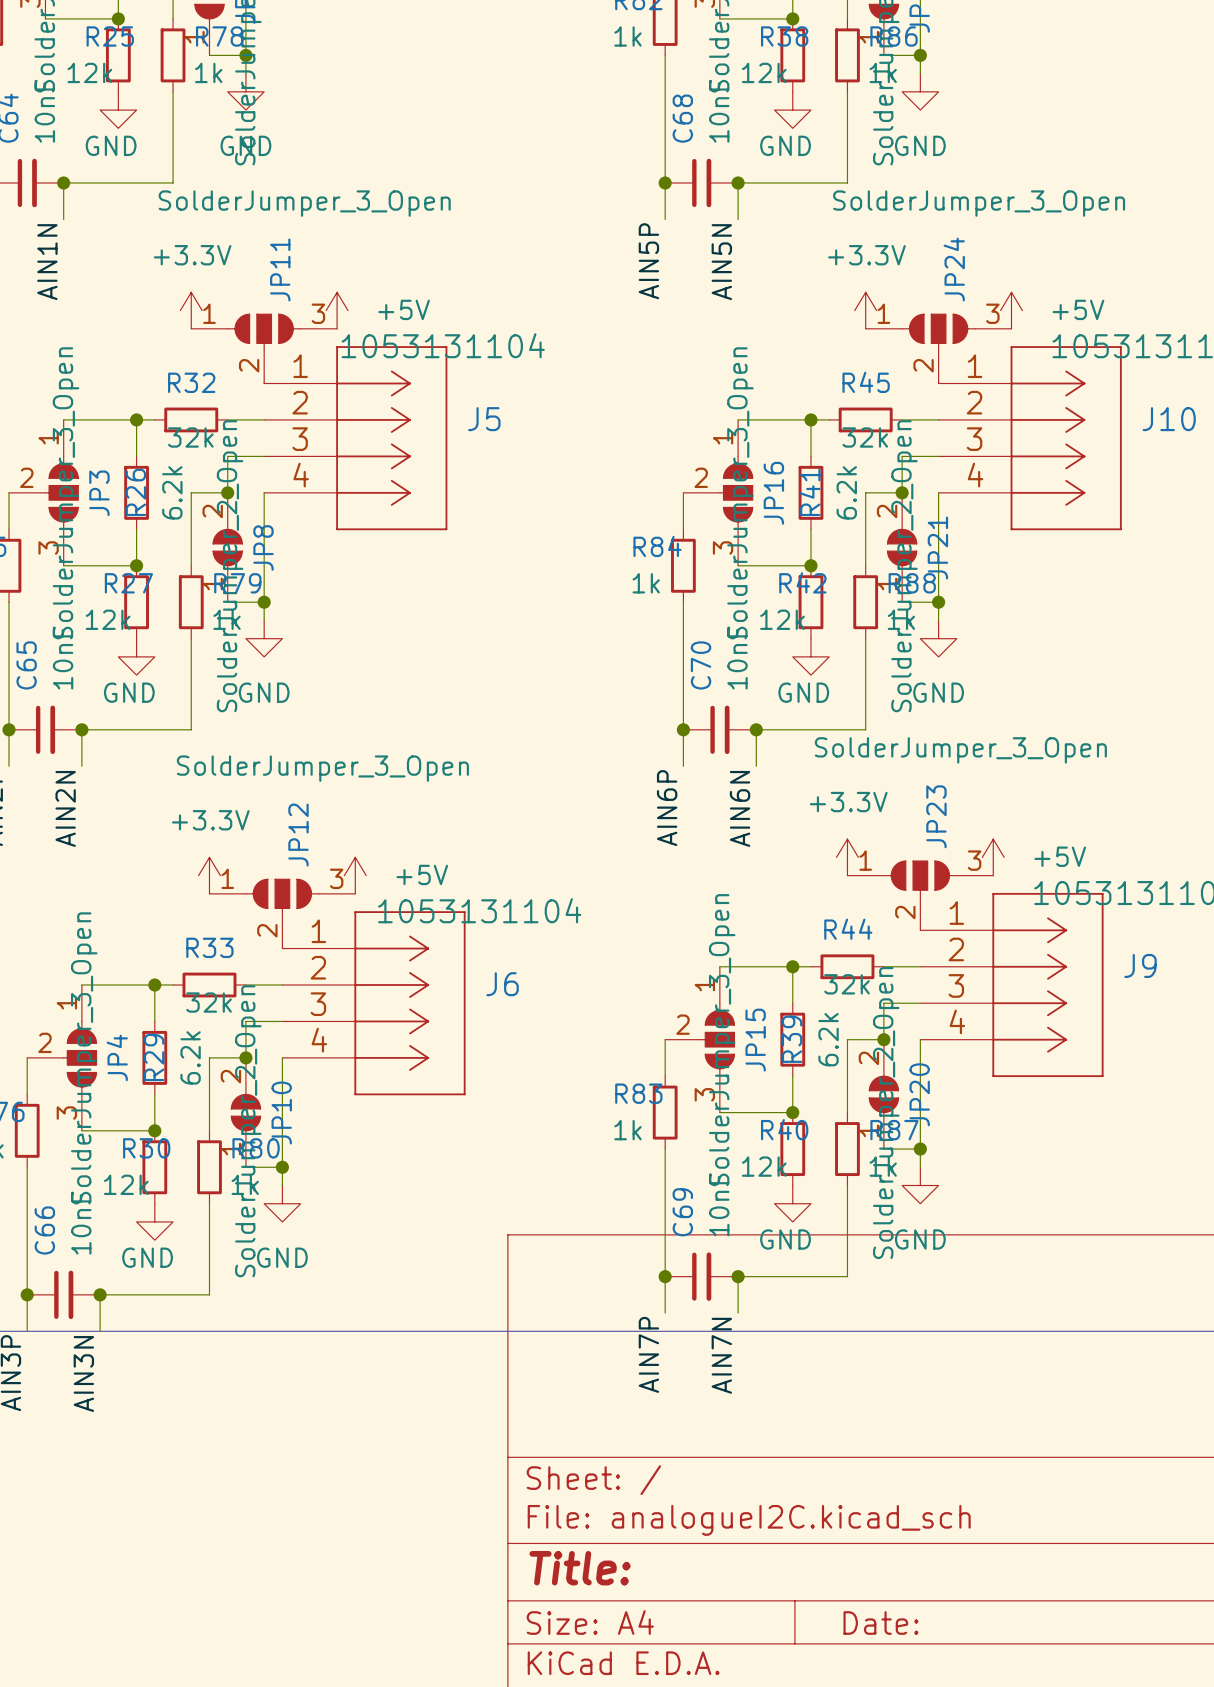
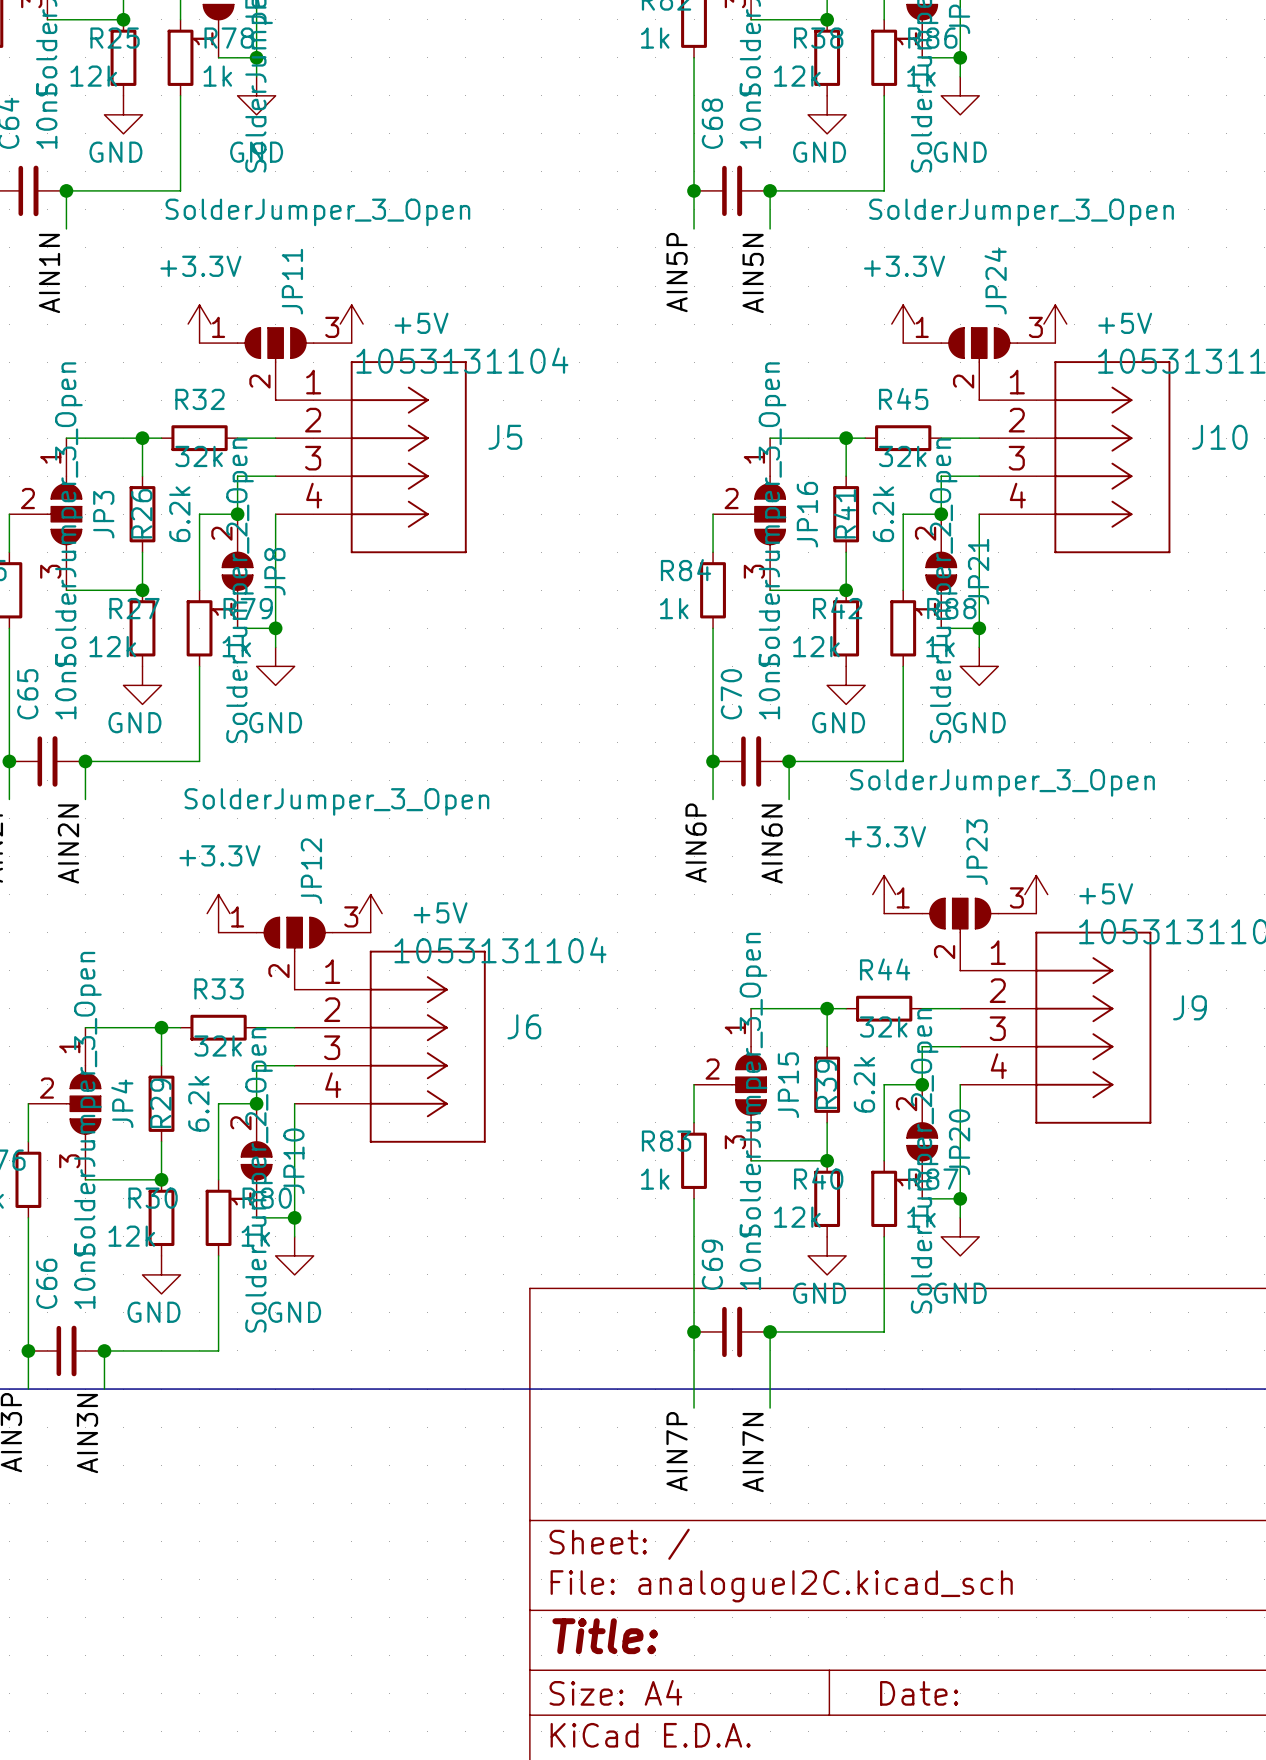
wire: none -> (694, 1370) (694, 1408)
wire: none -> (770, 1370) (770, 1408)
label position: AIN7P (648, 1354) -> AIN7P (677, 1451)
label position: AIN7N (721, 1355) -> AIN7N (753, 1452)

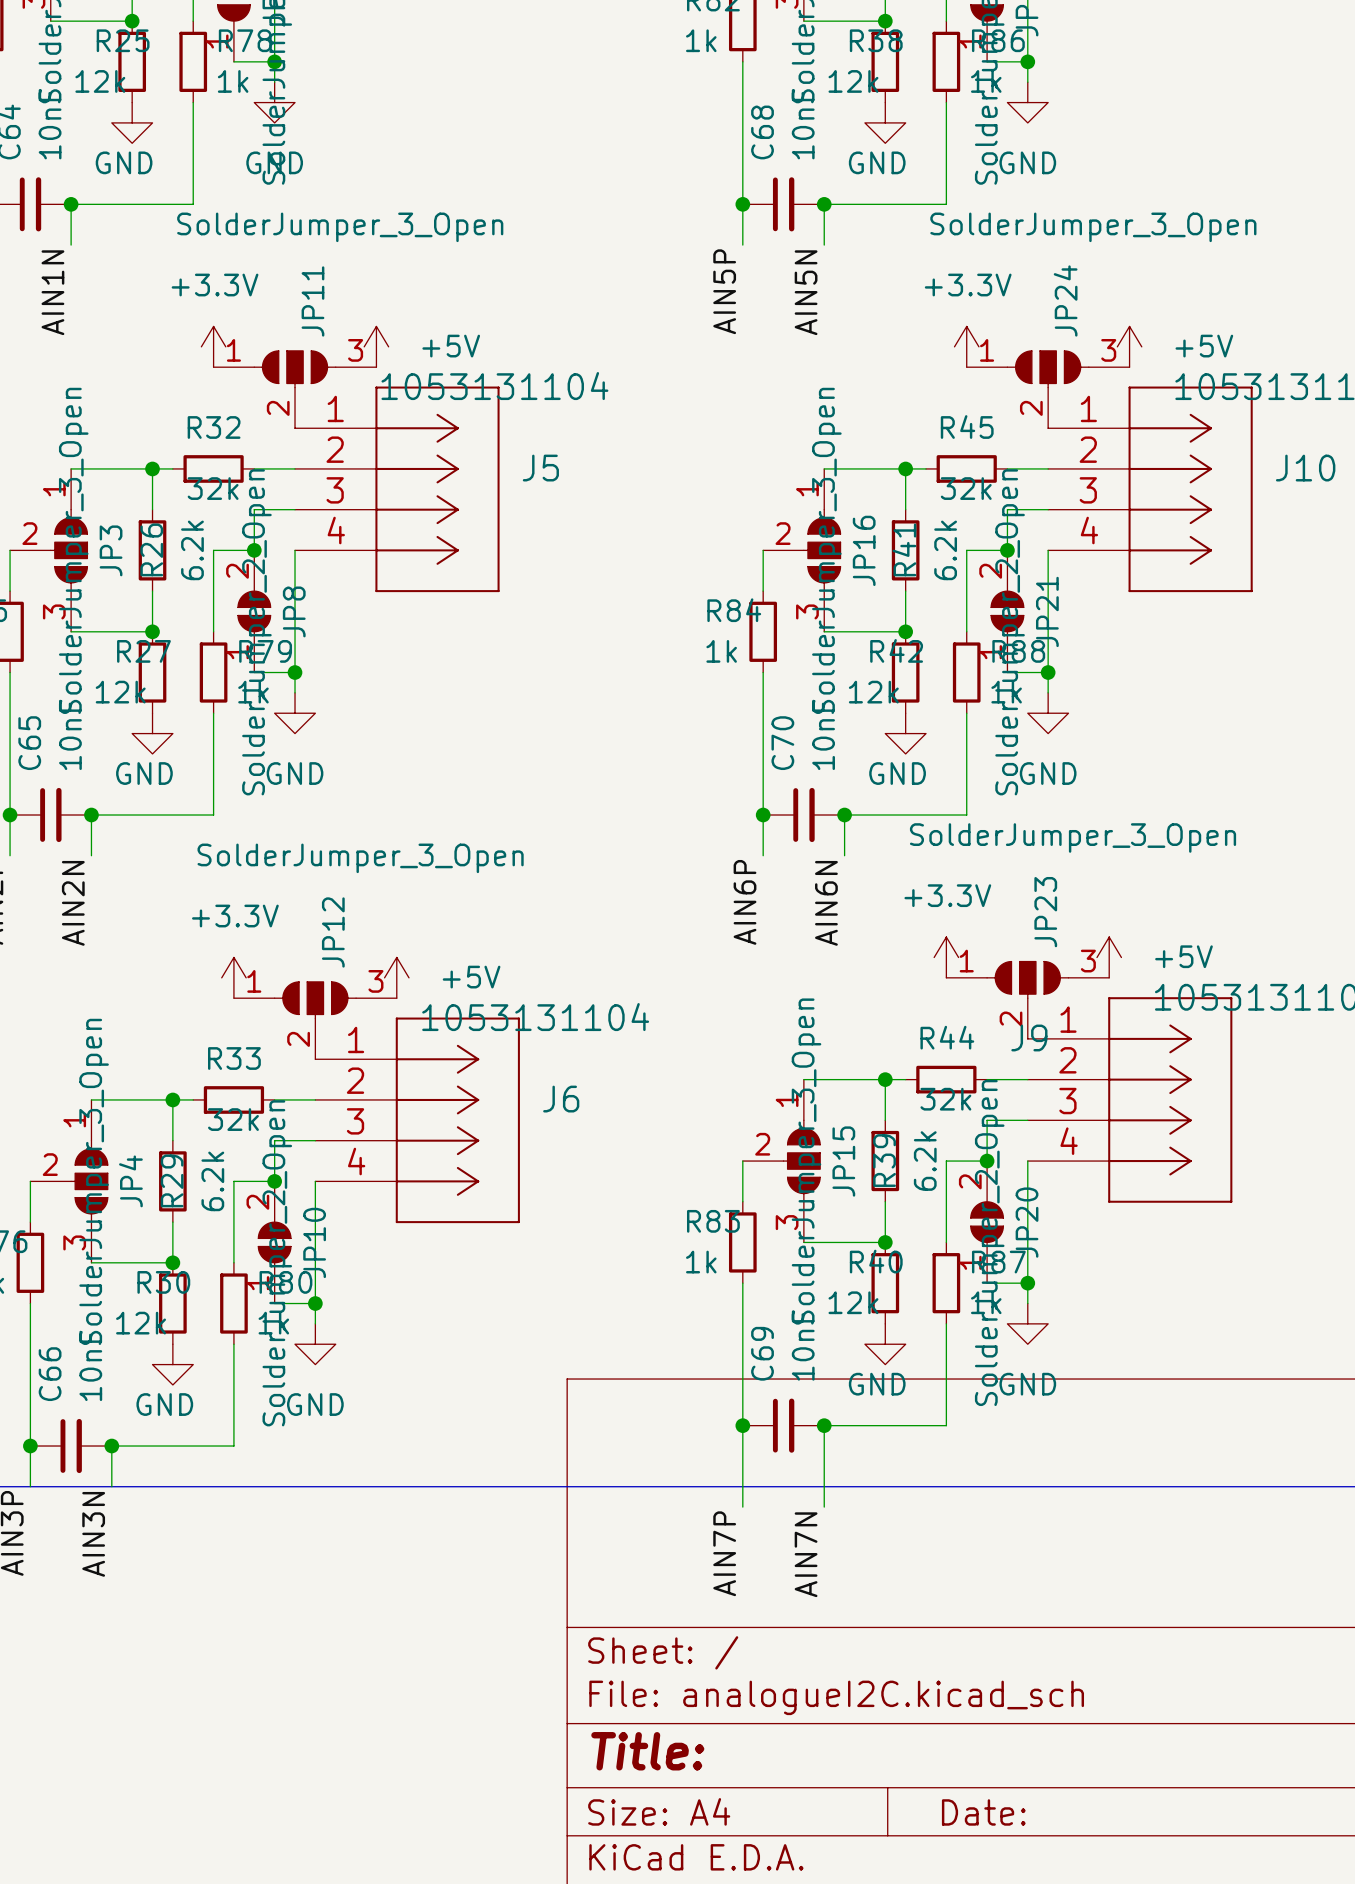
J9 name position: J9 (1189, 1007) -> J9 (1029, 1037)

